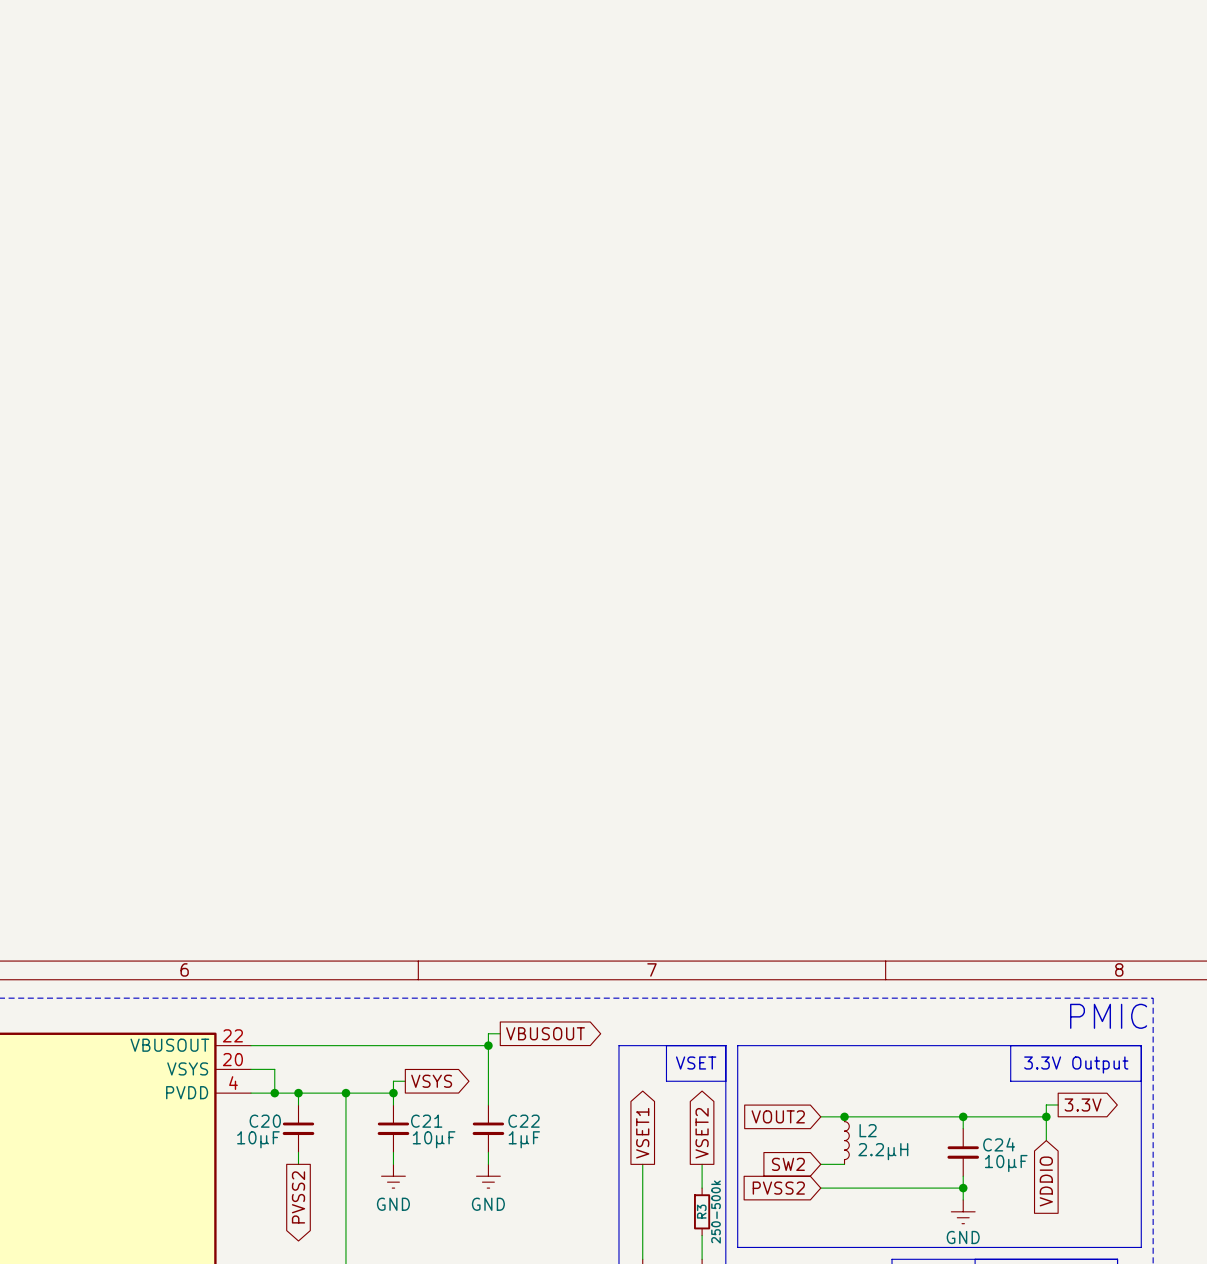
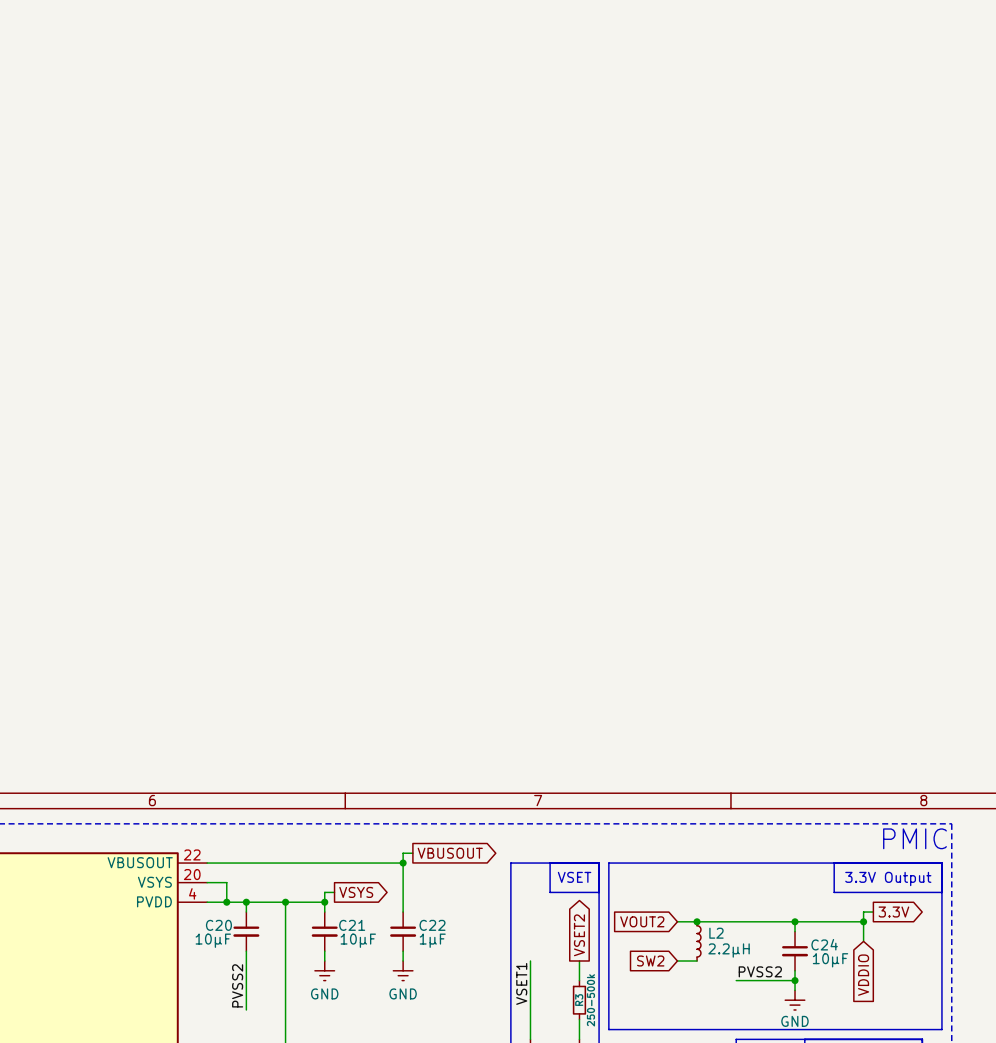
global label: VSET1 (642, 1133) -> none
wire: none -> (246, 961) (246, 1009)
label: none -> PVSS2 (760, 971)
global label: PVSS2 (778, 1188) -> none
wire: (820, 1188) (892, 1188) -> none
label: none -> VSET1 (521, 983)
label: none -> PVSS2 (237, 985)
global label: PVSS2 (298, 1197) -> none

